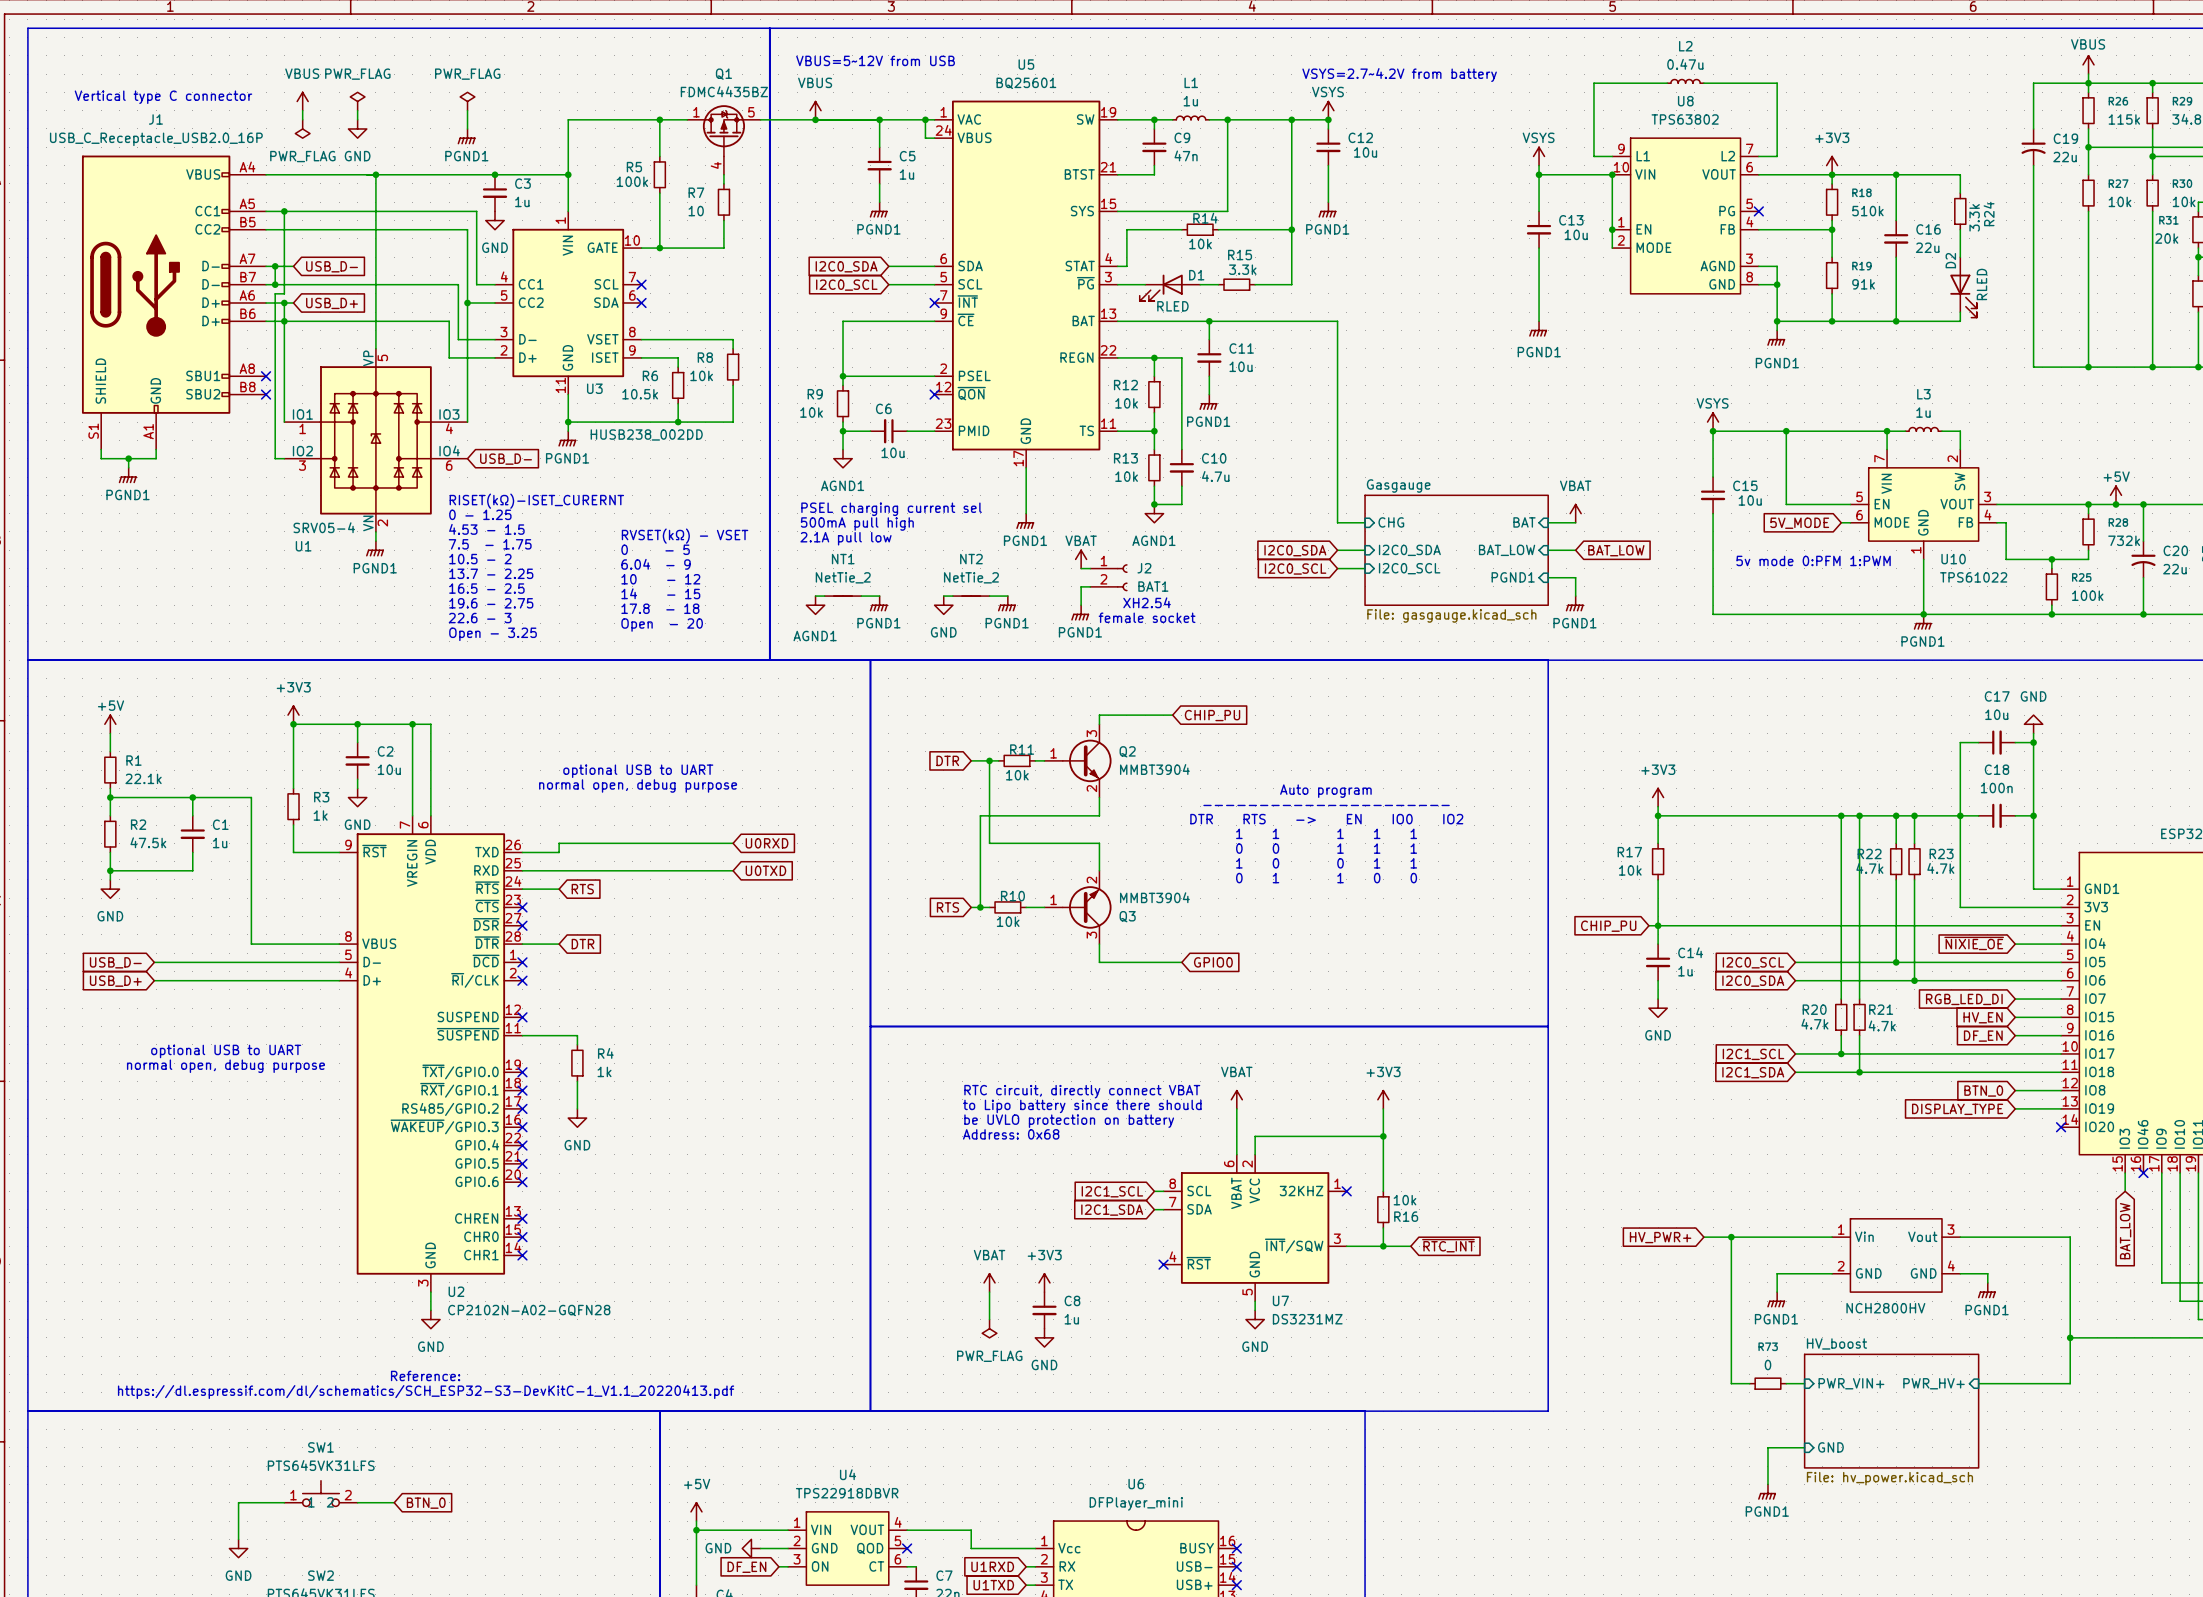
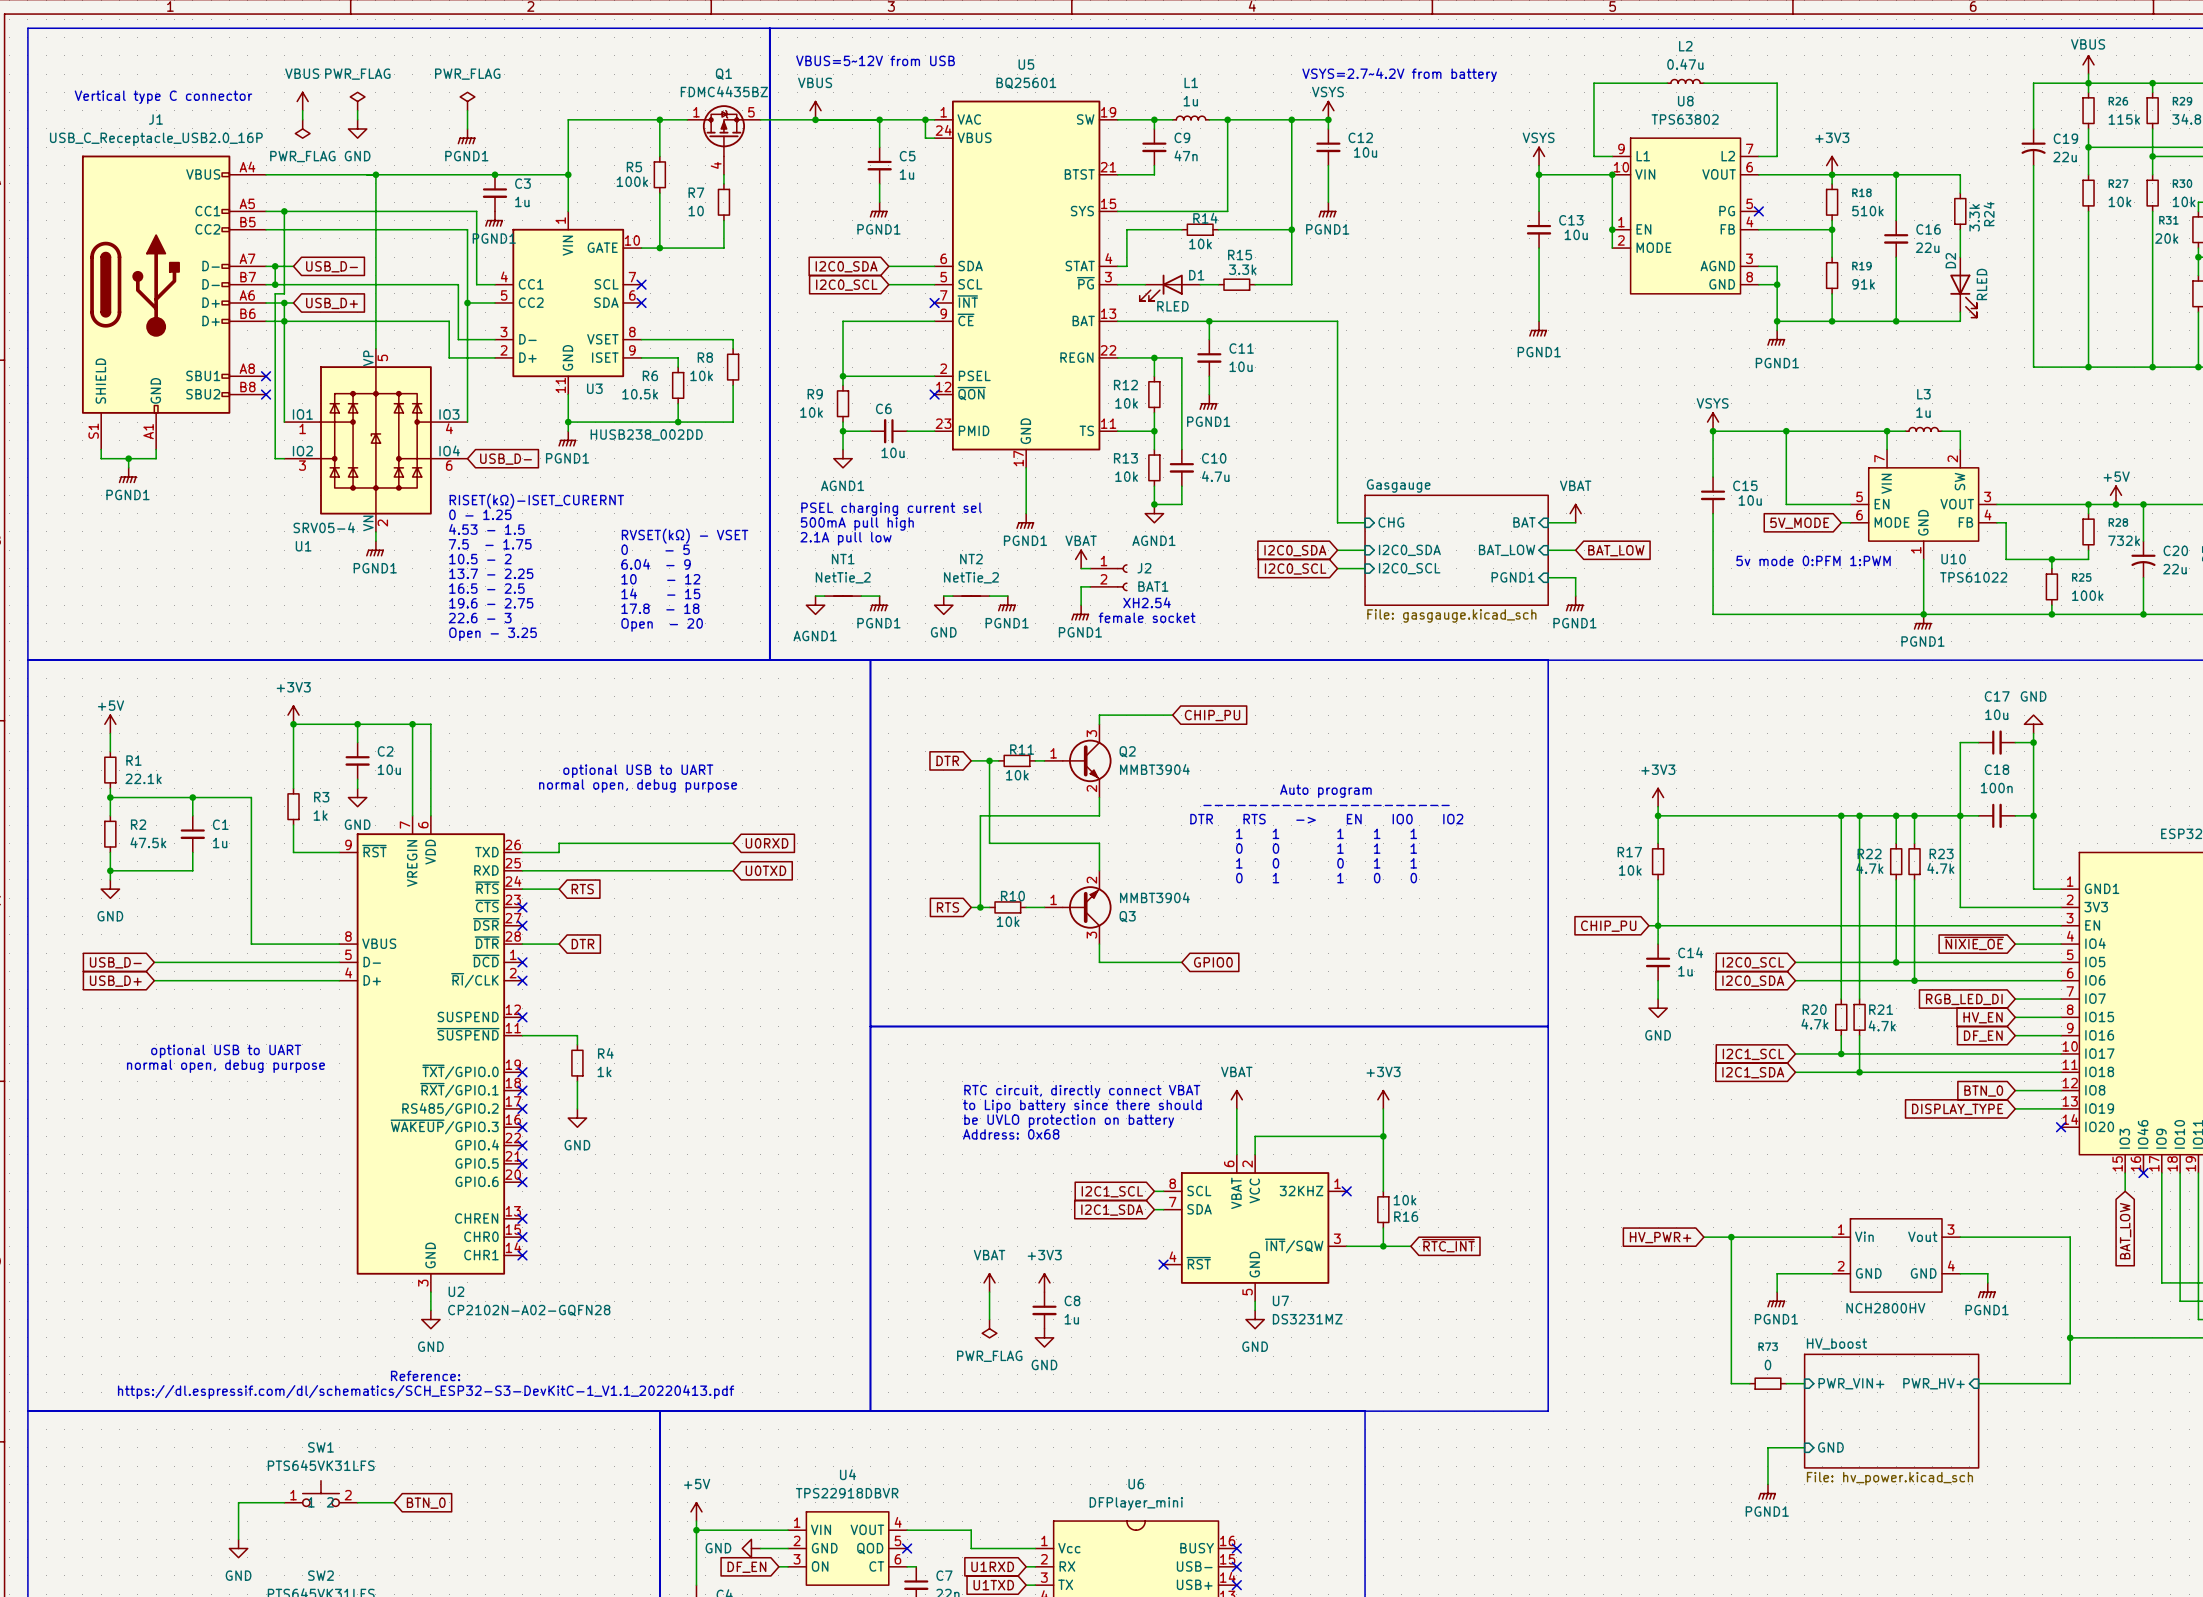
power symbol: GND (494, 220) -> PGND1 (494, 219)

